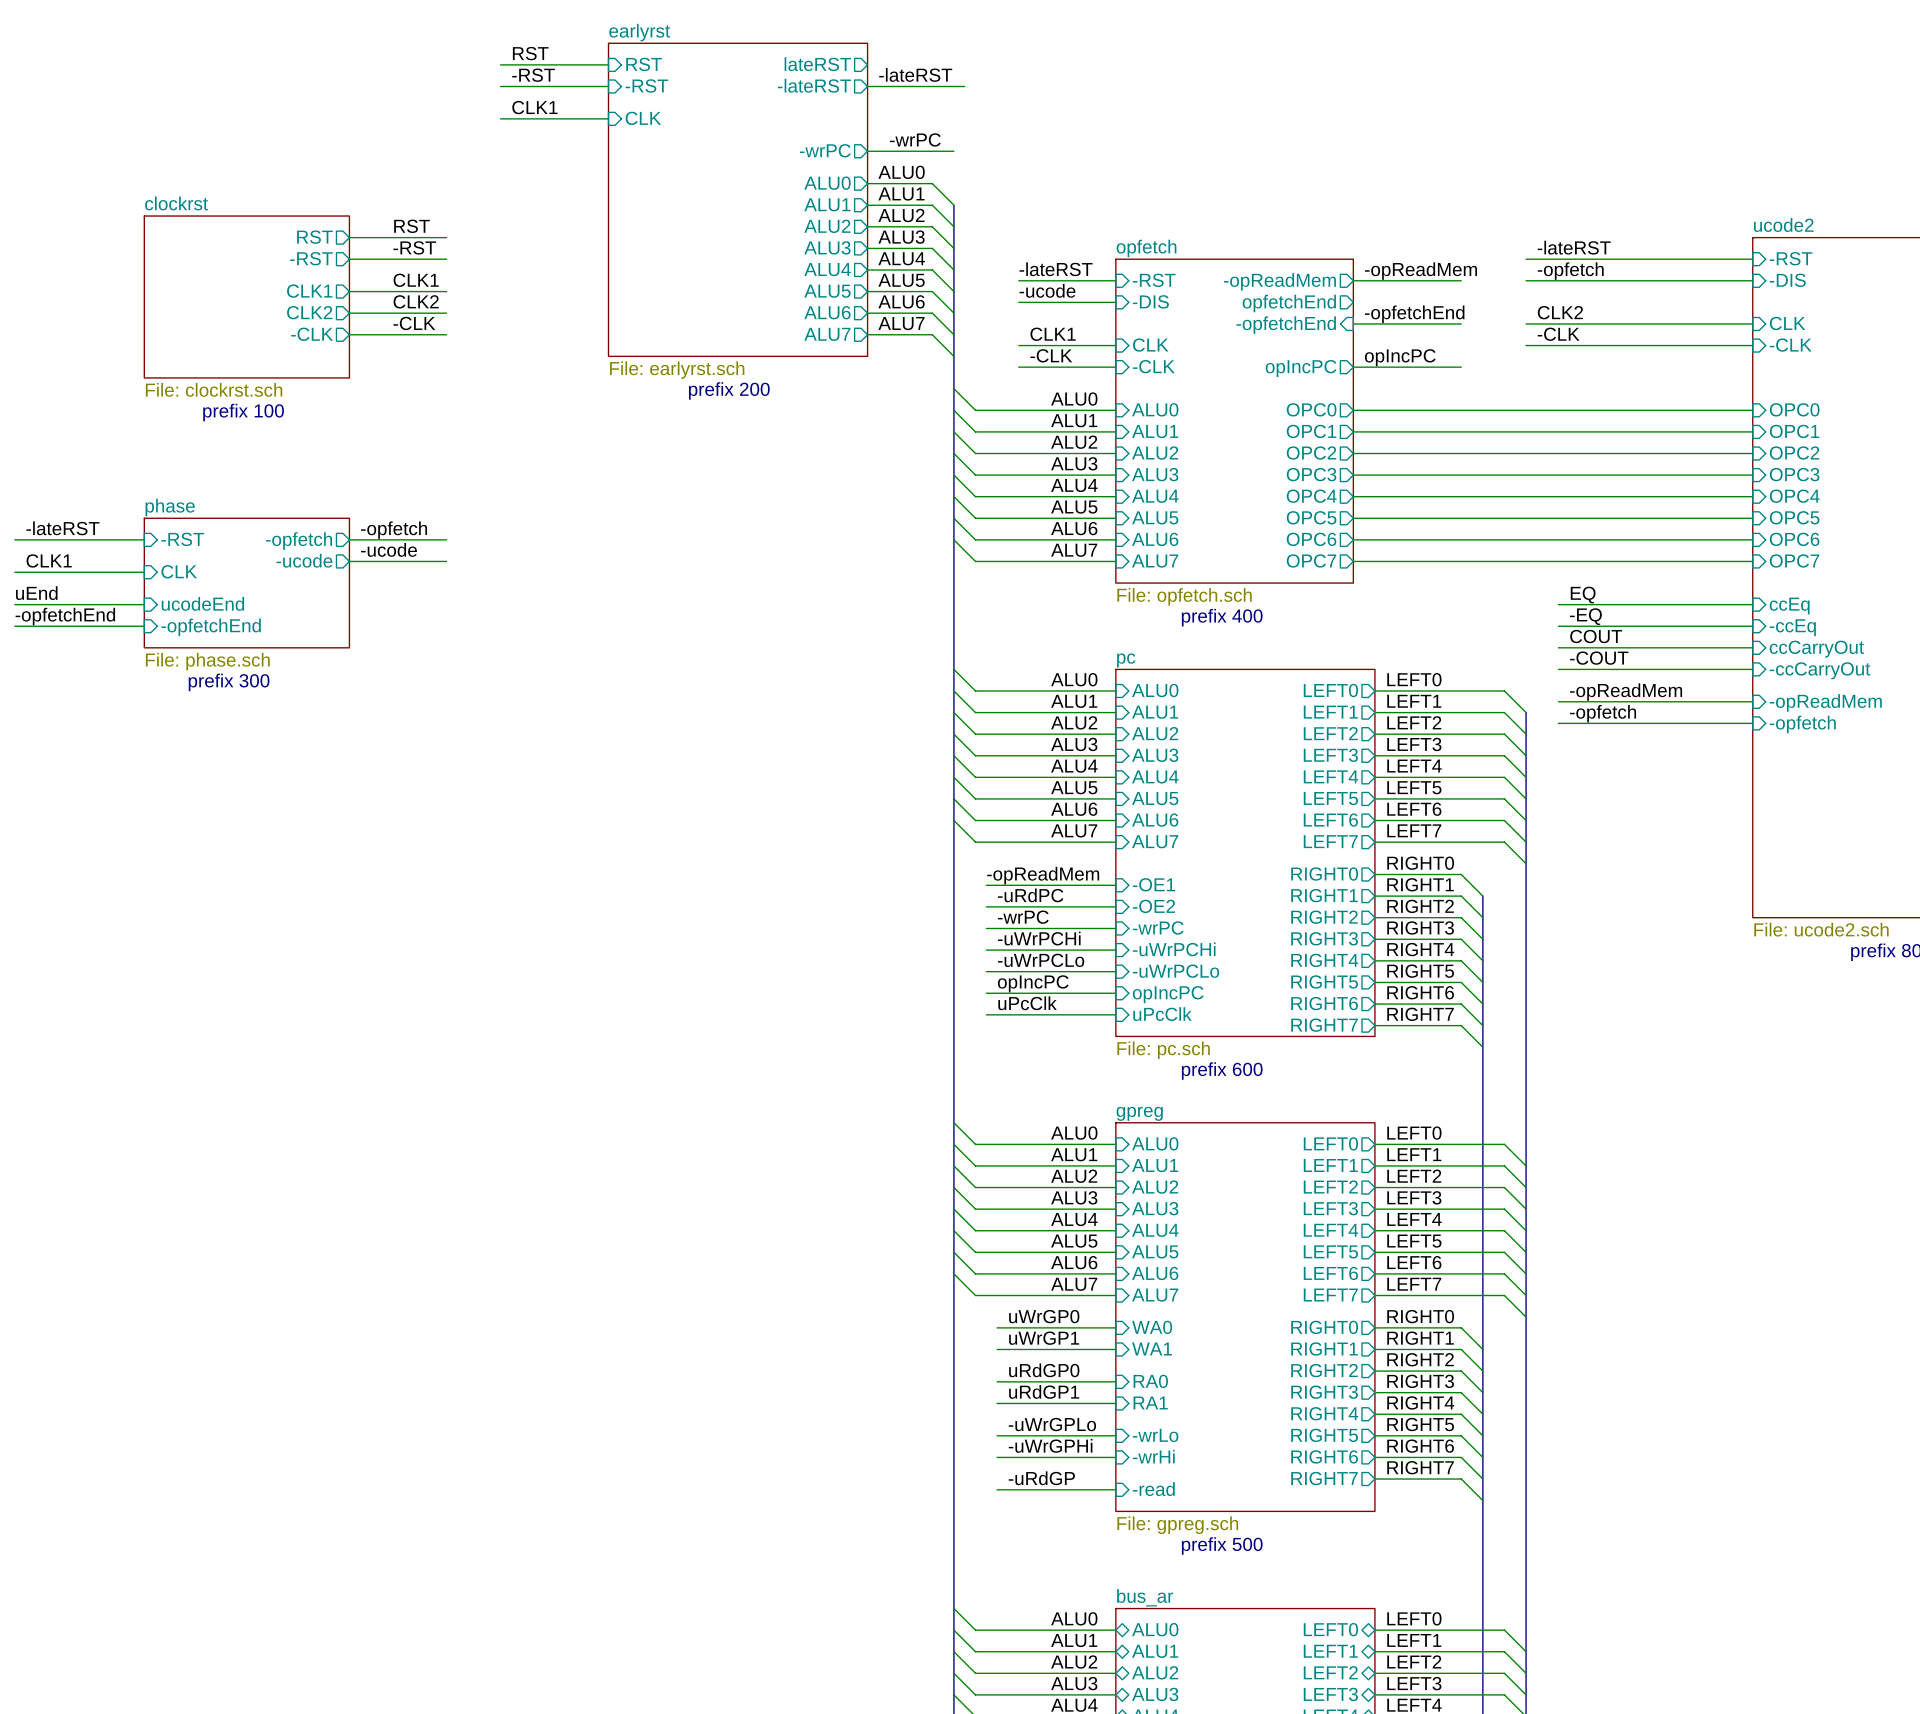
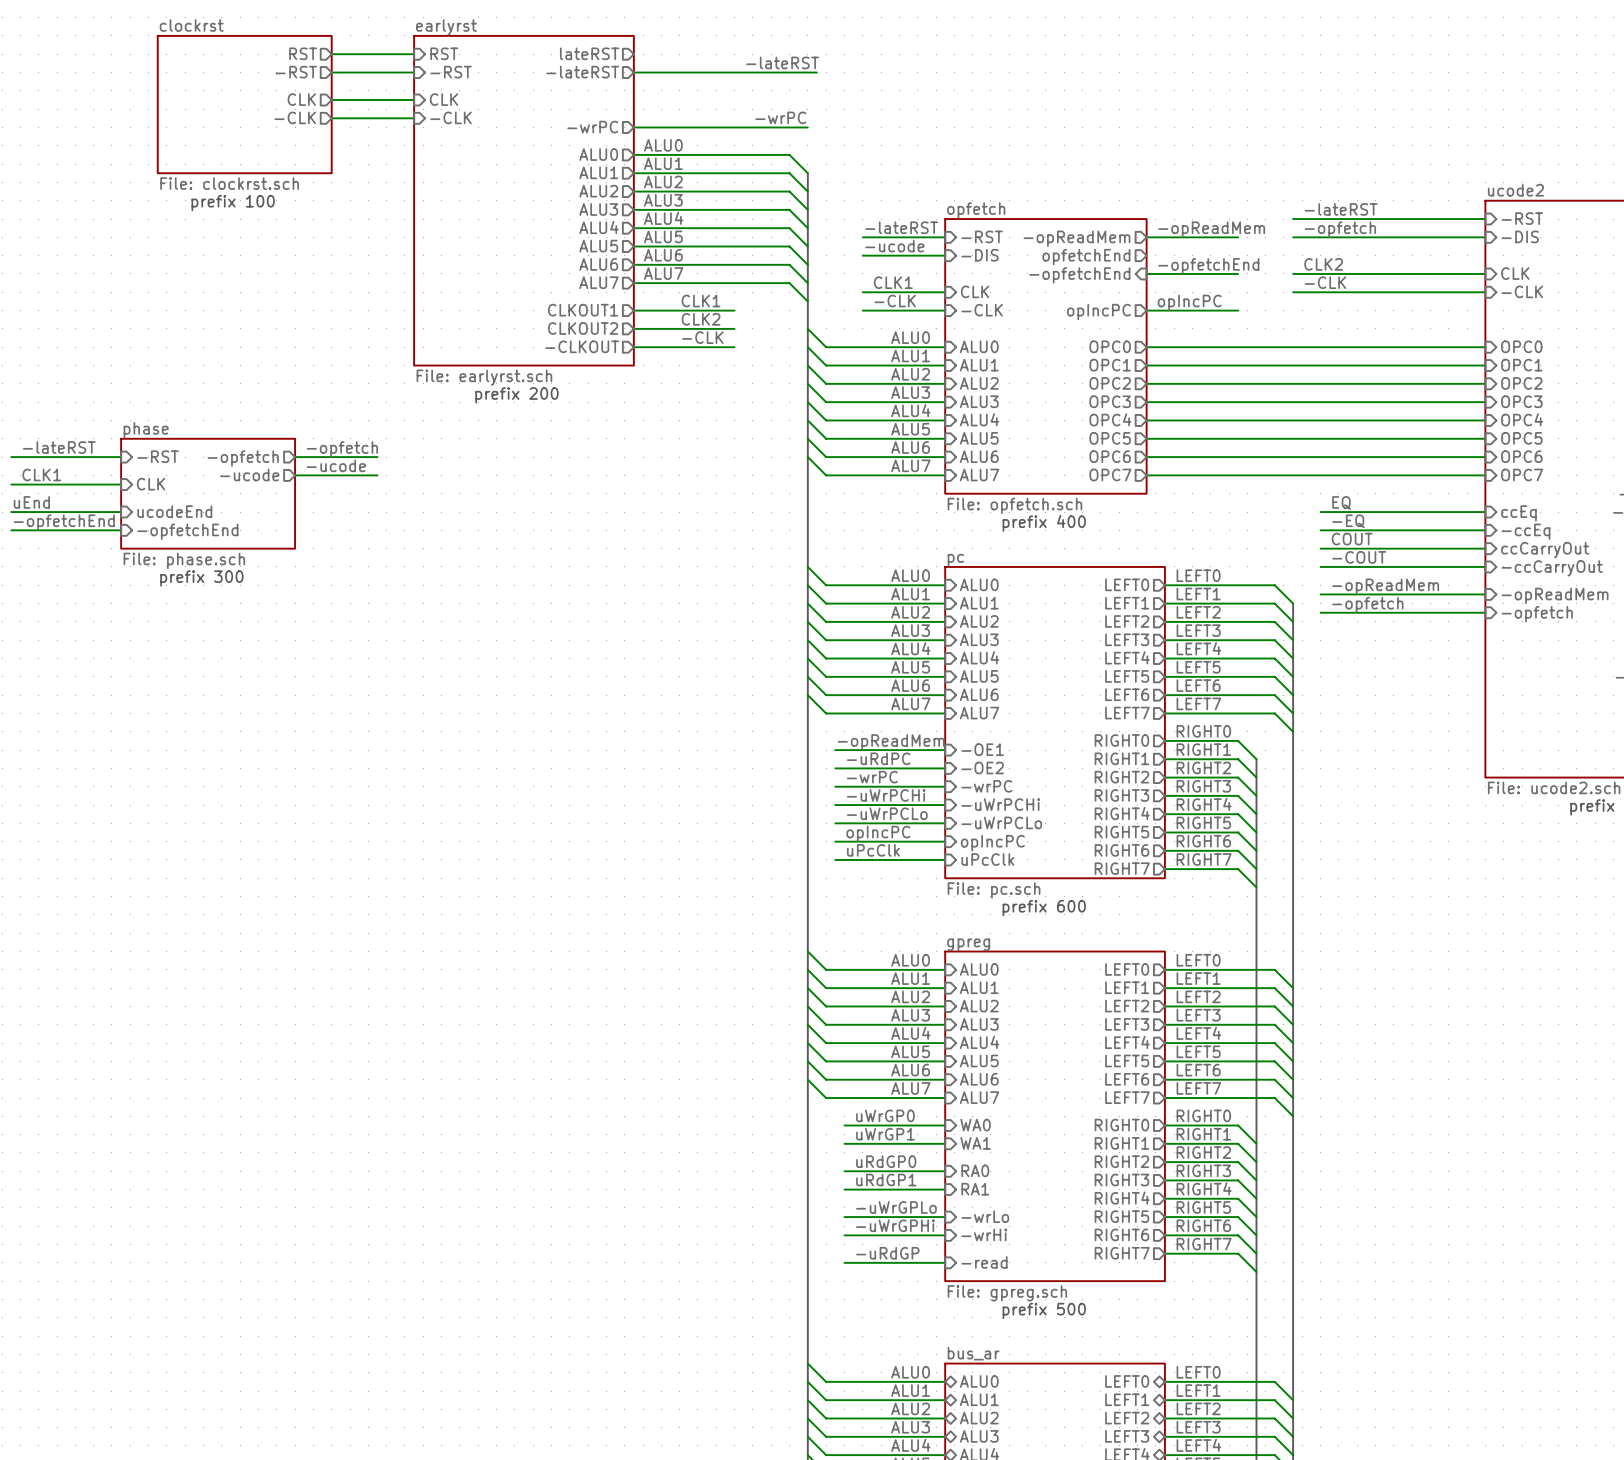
label: RST (530, 53) -> none
sheet pin: none -> RST (303, 53)
wire: (500, 64) (608, 64) -> none
sheet pin position: RST (644, 64) -> RST (444, 53)
sheet pin position: lateRST (817, 64) -> lateRST (589, 53)
label: -RST (533, 75) -> none
sheet pin position: -lateRST (814, 85) -> -lateRST (582, 72)
sheet pin: none -> -RST (296, 72)
wire: (500, 86) (608, 86) -> none
sheet pin position: -RST (646, 86) -> -RST (451, 72)
wire: none -> (633, 72) (734, 72)
label: CLK1 (534, 107) -> none
sheet pin: none -> CLK (301, 99)
wire: (500, 118) (608, 118) -> none
sheet pin position: CLK (643, 118) -> CLK (444, 99)
sheet pin: none -> -CLK (295, 117)
sheet pin: none -> -CLK (451, 117)
sheet pin position: -wrPC (825, 150) -> -wrPC (592, 127)
wire: none -> (633, 127) (734, 127)
label position: ALU0 (901, 172) -> ALU0 (663, 145)
wire: none -> (633, 154) (734, 154)
sheet pin position: ALU0 (827, 183) -> ALU0 (598, 154)
label position: ALU1 (901, 194) -> ALU1 (663, 163)
sheet earlyrst: File: earlyrst.sch (738, 199) -> none
sheet pin position: ALU1 (827, 204) -> ALU1 (598, 172)
wire: none -> (633, 173) (734, 173)
label position: ALU2 (901, 215) -> ALU2 (663, 181)
label: RST (411, 226) -> none
wire: none -> (633, 191) (734, 191)
sheet pin position: ALU2 (827, 226) -> ALU2 (598, 191)
sheet pin: RST (314, 237) -> none
wire: (349, 237) (446, 237) -> (331, 54) (414, 54)
sheet earlyrst: none -> File: earlyrst.sch (523, 200)
label position: ALU3 (901, 237) -> ALU3 (663, 200)
label: -RST (414, 247) -> none
sheet pin position: ALU3 (827, 247) -> ALU3 (598, 209)
wire: none -> (633, 209) (734, 209)
sheet pin: -RST (311, 258) -> none
label position: ALU4 (901, 258) -> ALU4 (663, 218)
wire: (349, 259) (446, 259) -> (331, 72) (414, 72)
sheet pin position: ALU4 (827, 269) -> ALU4 (599, 227)
wire: none -> (633, 228) (734, 228)
label: CLK1 (416, 280) -> none
label position: ALU5 (901, 280) -> ALU5 (663, 236)
sheet pin: CLK1 (309, 291) -> none
wire: (349, 291) (446, 291) -> (331, 100) (414, 100)
wire: none -> (633, 246) (734, 246)
sheet pin position: ALU5 (827, 291) -> ALU5 (598, 246)
sheet clockrst position: (246, 296) -> (244, 104)
label: CLK2 (416, 301) -> none
label position: ALU6 (901, 301) -> ALU6 (663, 255)
sheet pin: CLK2 (309, 312) -> none
sheet pin position: ALU6 (827, 312) -> ALU6 (598, 264)
wire: (349, 313) (446, 313) -> (331, 118) (414, 118)
wire: none -> (633, 264) (734, 264)
label: -CLK (414, 323) -> none
label position: ALU7 (901, 323) -> ALU7 (663, 273)
sheet pin: -CLK (312, 334) -> none
wire: (349, 334) (446, 334) -> none
wire: none -> (633, 283) (734, 283)
sheet pin position: ALU7 (827, 334) -> ALU7 (599, 282)
label: none -> CLK1 (701, 301)
sheet pin: none -> CLKOUT1 (583, 310)
wire: none -> (633, 310) (734, 310)
label: none -> CLK2 (701, 319)
sheet pin: none -> CLKOUT2 (583, 328)
wire: none -> (633, 328) (734, 328)
text position: prefix 200 (729, 390) -> prefix 200 (516, 395)
label: none -> -CLK (702, 337)
sheet pin: none -> -CLKOUT (582, 346)
wire: none -> (633, 347) (734, 347)
text position: prefix 100 (243, 412) -> prefix 100 (233, 203)

